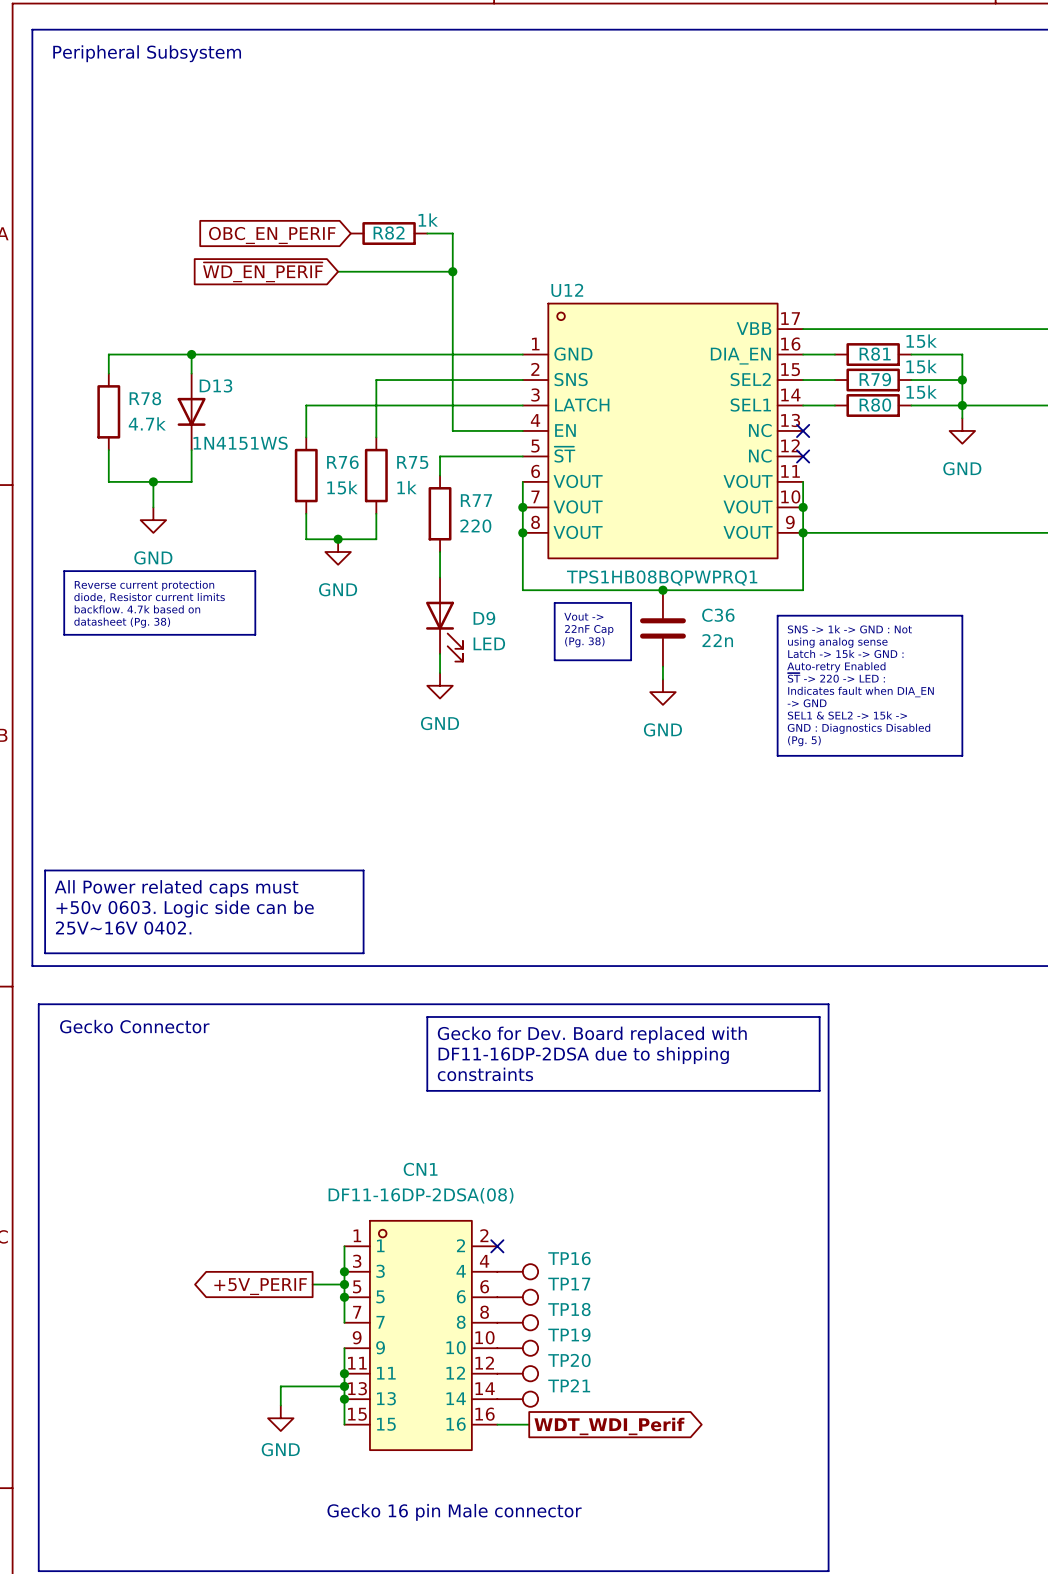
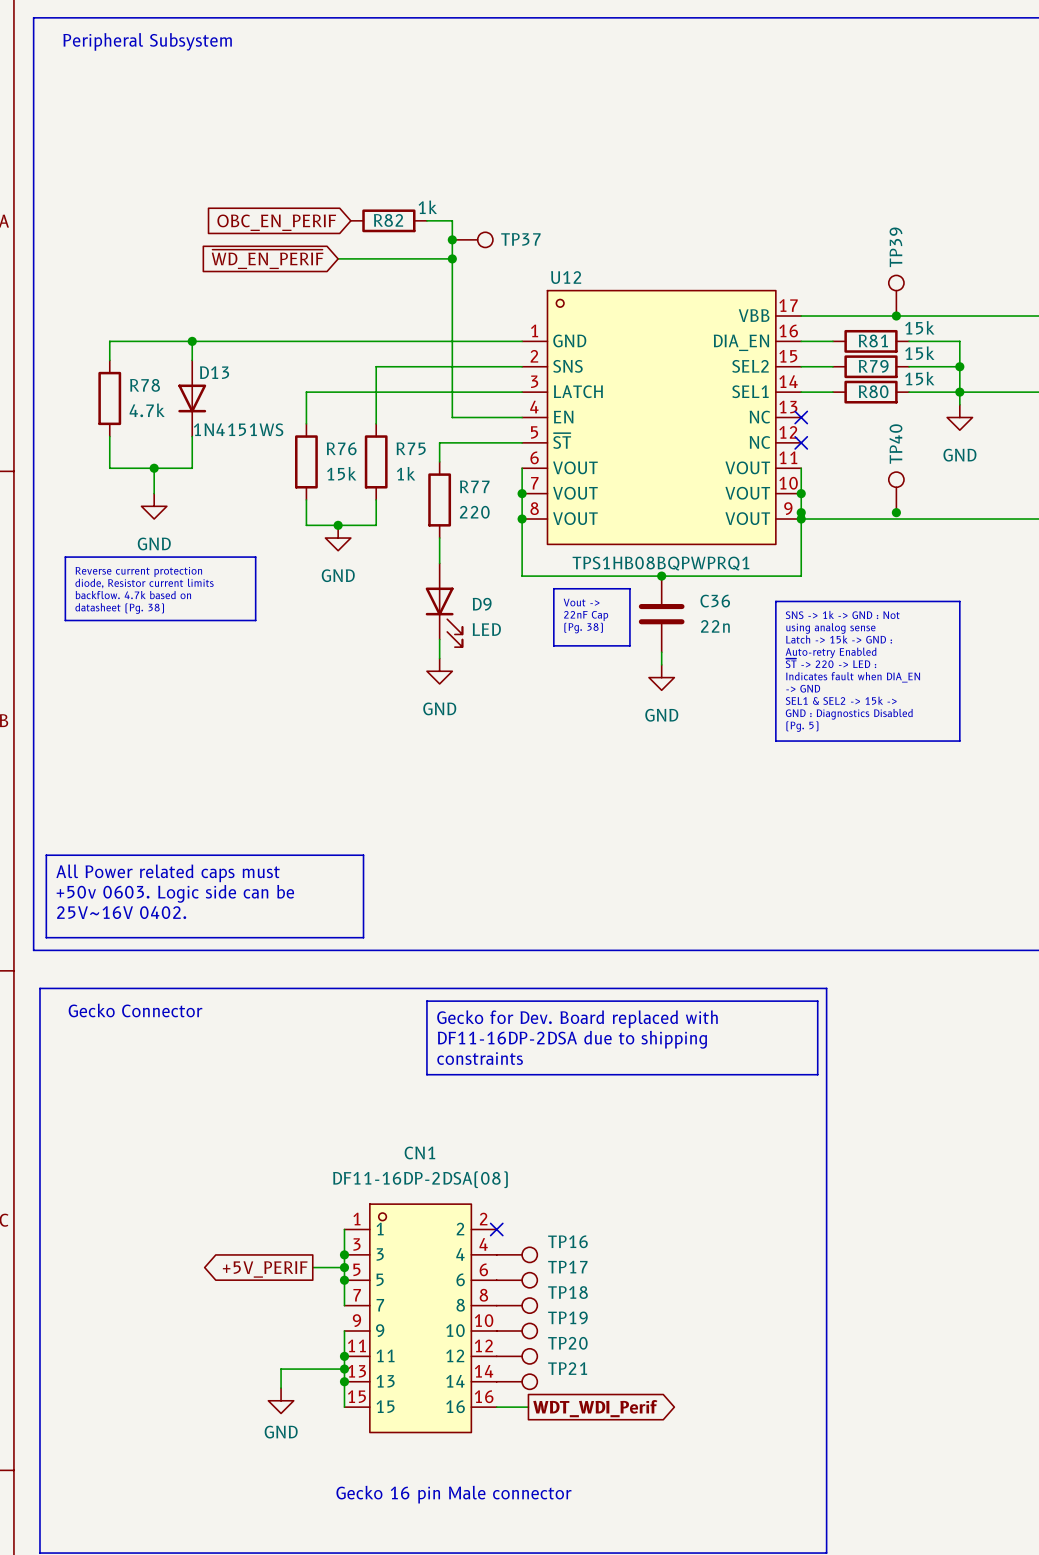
junction: none -> (452, 239)
TP37: none -> (472, 239)
TP39: none -> (896, 295)
junction: none -> (896, 316)
TP40: none -> (896, 492)
junction: none -> (801, 512)
junction: none -> (896, 512)

